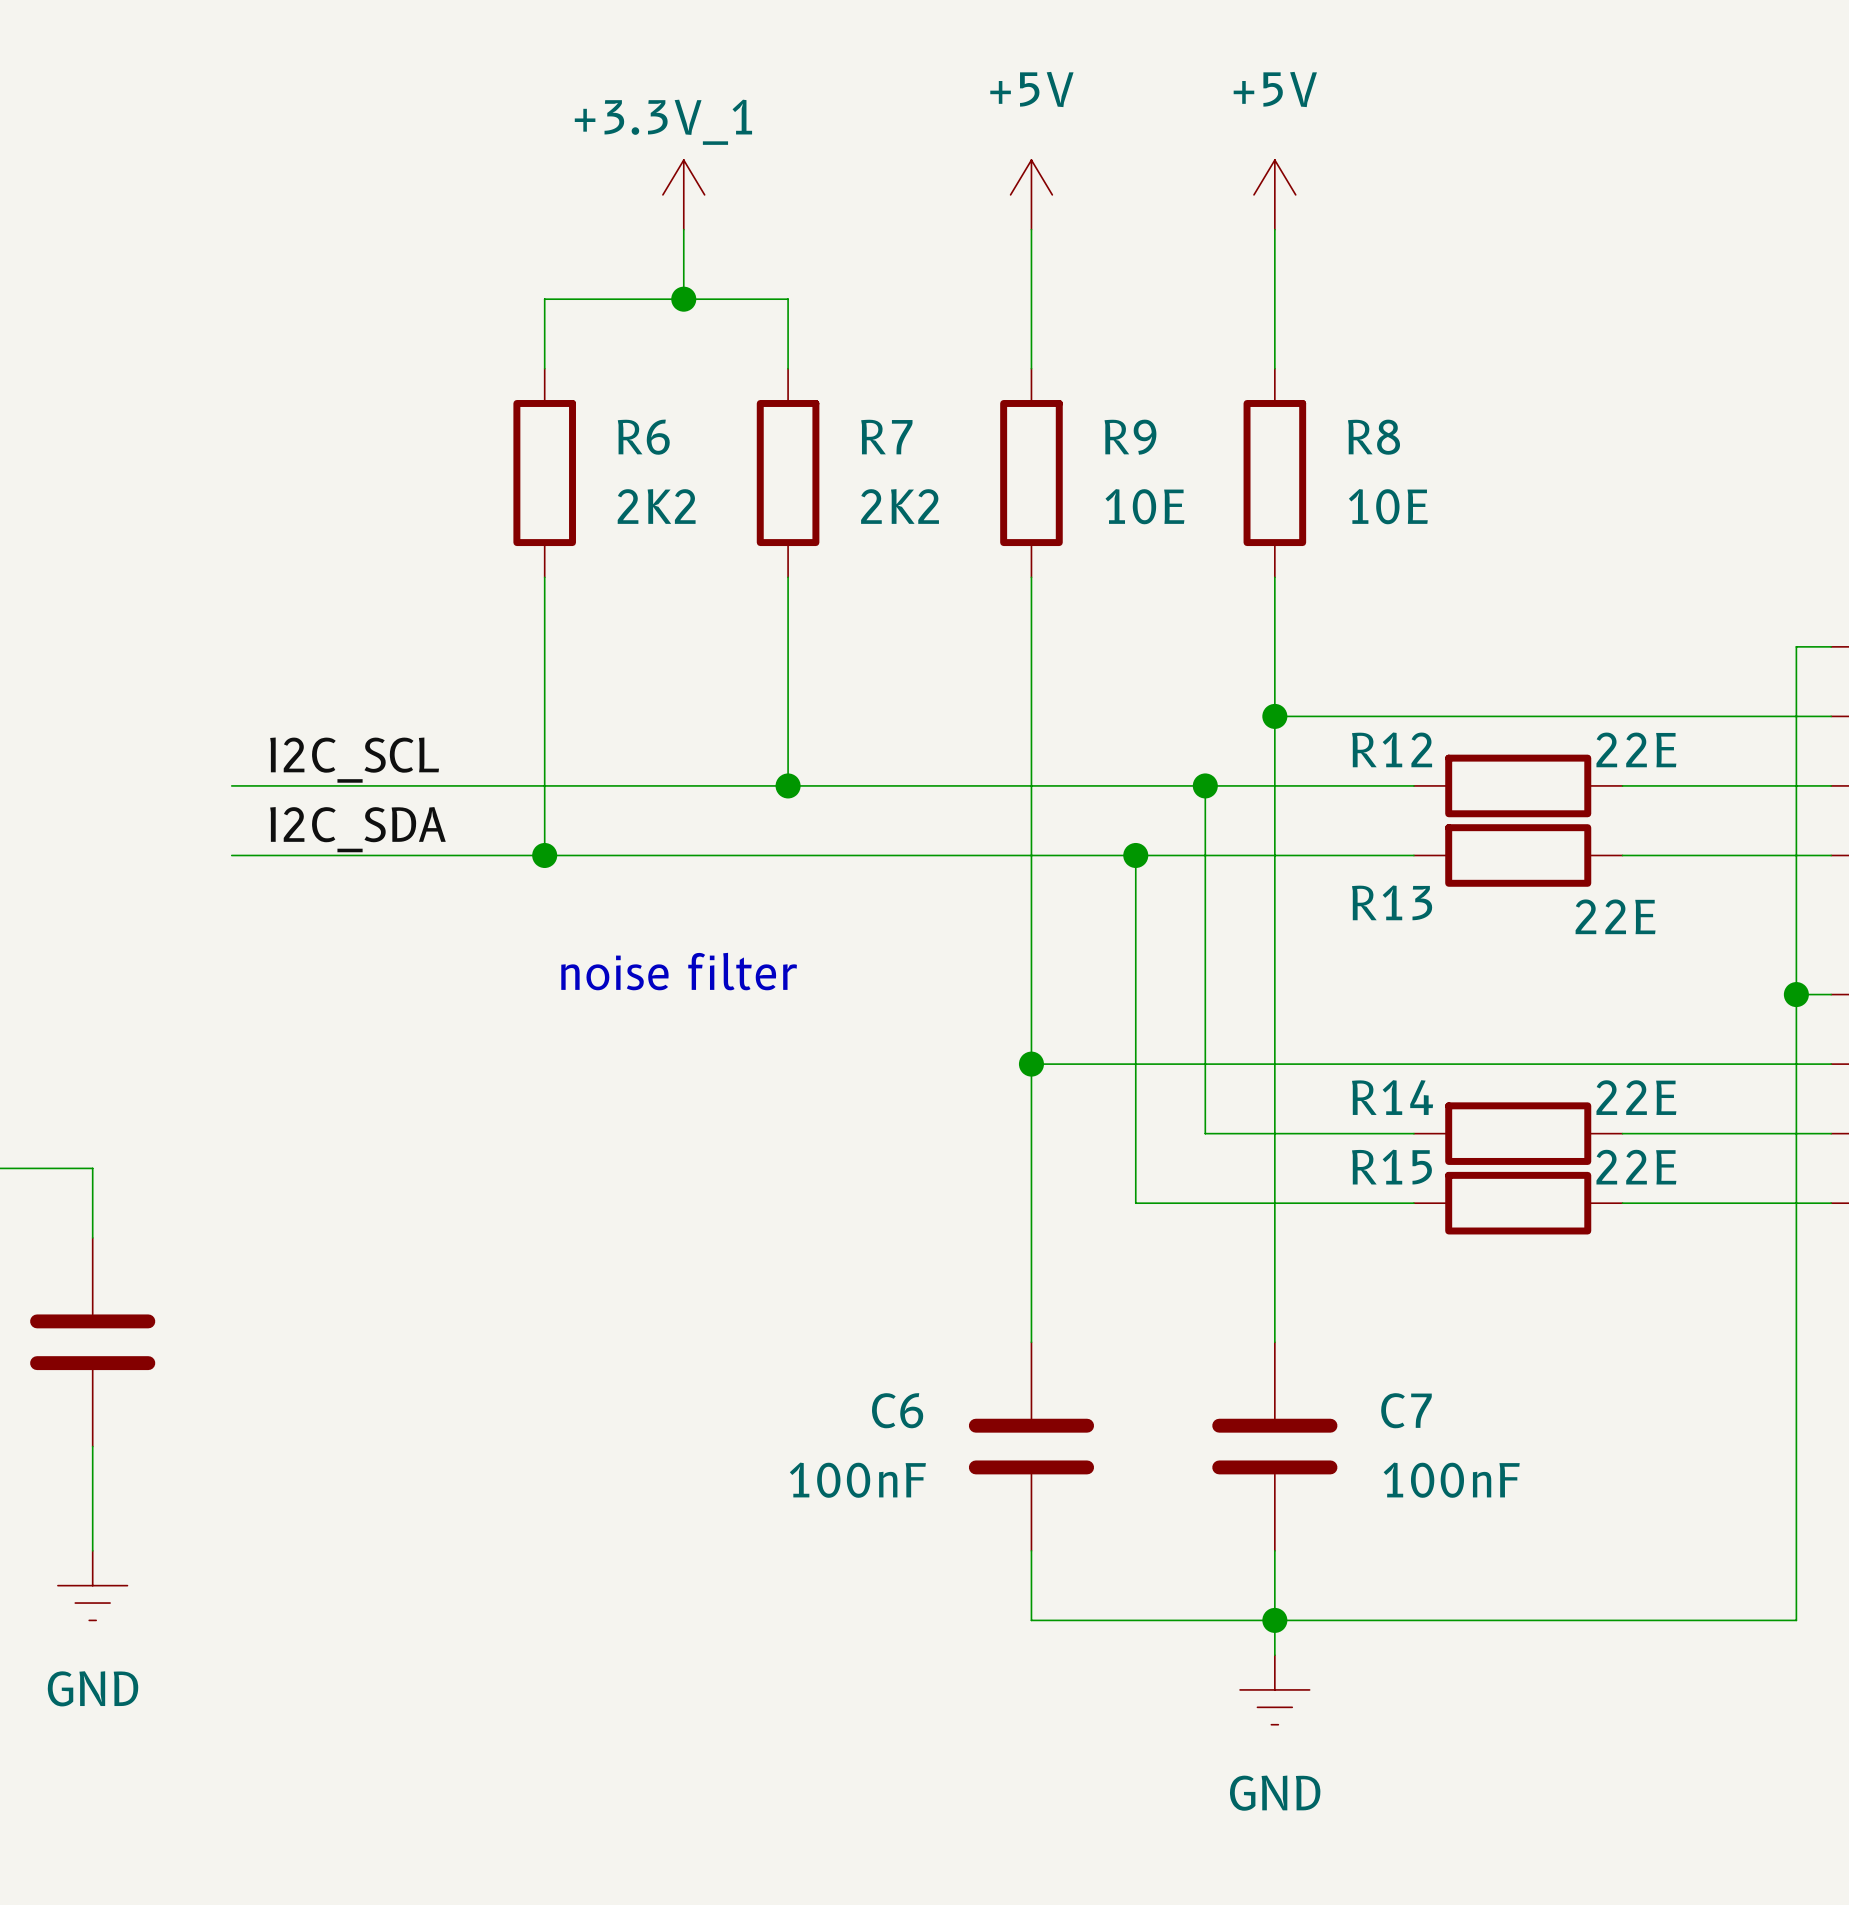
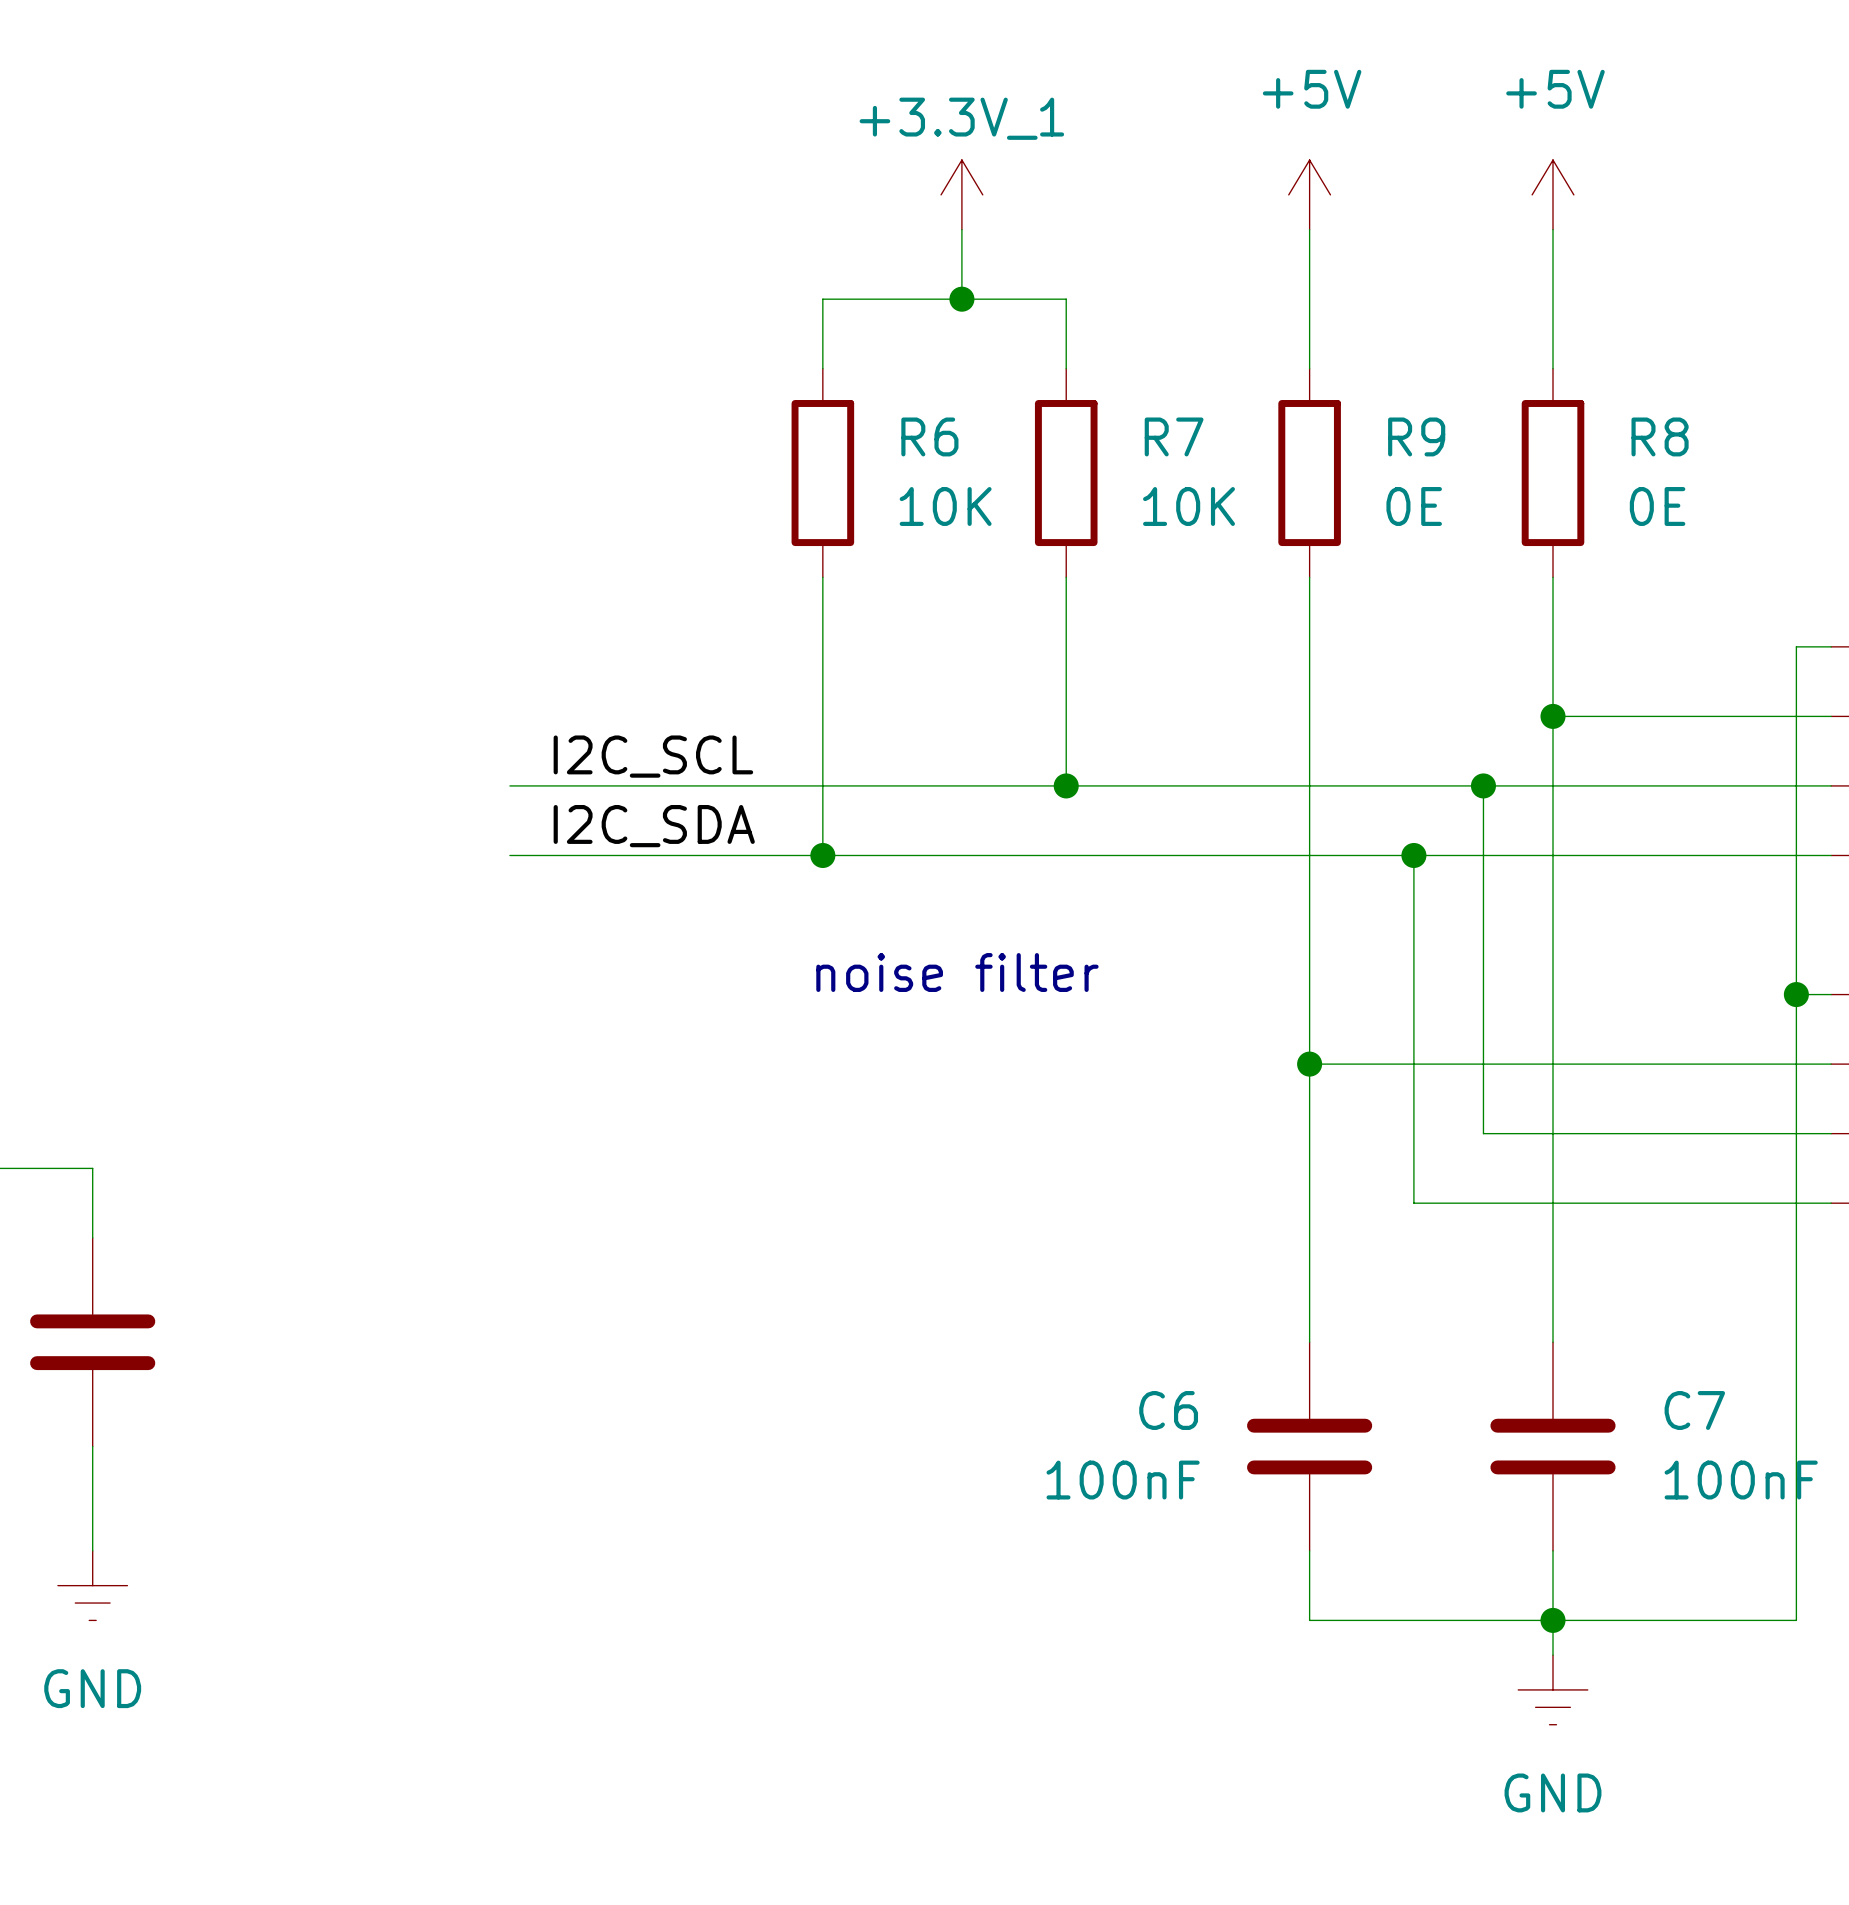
power symbol position: +3.3V_1 (683, 194) -> +3.3V_1 (961, 194)
power symbol: +5V (1031, 194) -> none
power symbol position: +5V (1274, 194) -> +5V (1309, 194)
power symbol: none -> +5V (1553, 194)
wire: (683, 229) (683, 299) -> (961, 229) (961, 299)
wire: (1031, 229) (1031, 368) -> (1309, 229) (1309, 368)
wire: (1274, 229) (1274, 368) -> (1553, 229) (1553, 368)
junction: (683, 299) -> none
junction: none -> (961, 299)
wire: (544, 368) (544, 299) (788, 299) (788, 368) -> (822, 368) (822, 299) (1066, 299) (1066, 368)
R6 position: (544, 473) -> (822, 473)
R7 position: (788, 473) -> (1066, 473)
R9 position: (1031, 473) -> (1309, 473)
R8 position: (1274, 473) -> (1553, 473)
R6 value: 2K2 (656, 506) -> 10K (945, 506)
R7 value: 2K2 (900, 506) -> 10K (1189, 506)
R9 value: 10E (1144, 506) -> 0E (1414, 506)
R8 value: 10E (1388, 506) -> 0E (1657, 506)
wire: (544, 577) (544, 855) -> (822, 577) (822, 855)
wire: (788, 577) (788, 785) -> (1066, 577) (1066, 785)
wire: (1031, 577) (1031, 1342) -> (1309, 577) (1309, 1342)
wire: (1274, 577) (1274, 1342) -> (1553, 577) (1553, 1342)
wire: (1274, 716) (1553, 716) -> none
junction: (1274, 716) -> none
junction: none -> (1553, 716)
label position: I2C_SCL (354, 760) -> I2C_SCL (653, 756)
wire: (231, 785) (509, 785) -> none
junction position: (788, 785) -> (822, 855)
junction: none -> (1066, 785)
wire: (1205, 785) (1205, 1133) (1413, 1133) -> none
junction: (1205, 785) -> none
wire: none -> (1413, 785) (1622, 785)
wire: none -> (1483, 785) (1483, 1133) (1622, 1133)
junction: none -> (1483, 785)
R12: 22E (1518, 785) -> none
label position: I2C_SDA (357, 829) -> I2C_SDA (654, 826)
wire: (231, 855) (509, 855) -> none
junction: (544, 855) -> none
wire: (1135, 855) (1135, 1203) (1413, 1203) -> none
junction: (1135, 855) -> none
junction: none -> (1413, 855)
R13: 22E (1518, 855) -> none
wire: none -> (1622, 855) (1413, 855) (1413, 1203) (1622, 1203)
text position: noise filter (679, 971) -> noise filter (957, 972)
wire: (1031, 1064) (1309, 1064) -> none
junction: (1031, 1064) -> none
junction: none -> (1309, 1064)
R14: 22E (1518, 1133) -> none
R15: 22E (1518, 1203) -> none
C6 position: (1031, 1446) -> (1309, 1446)
C7 position: (1274, 1446) -> (1553, 1446)
wire: (1031, 1550) (1031, 1620) (1309, 1620) -> (1309, 1550) (1309, 1620)
wire: (1274, 1550) (1274, 1655) -> (1553, 1550) (1553, 1655)
junction: (1274, 1620) -> none
junction: none -> (1553, 1620)
power symbol position: GND (1274, 1689) -> GND (1553, 1689)

